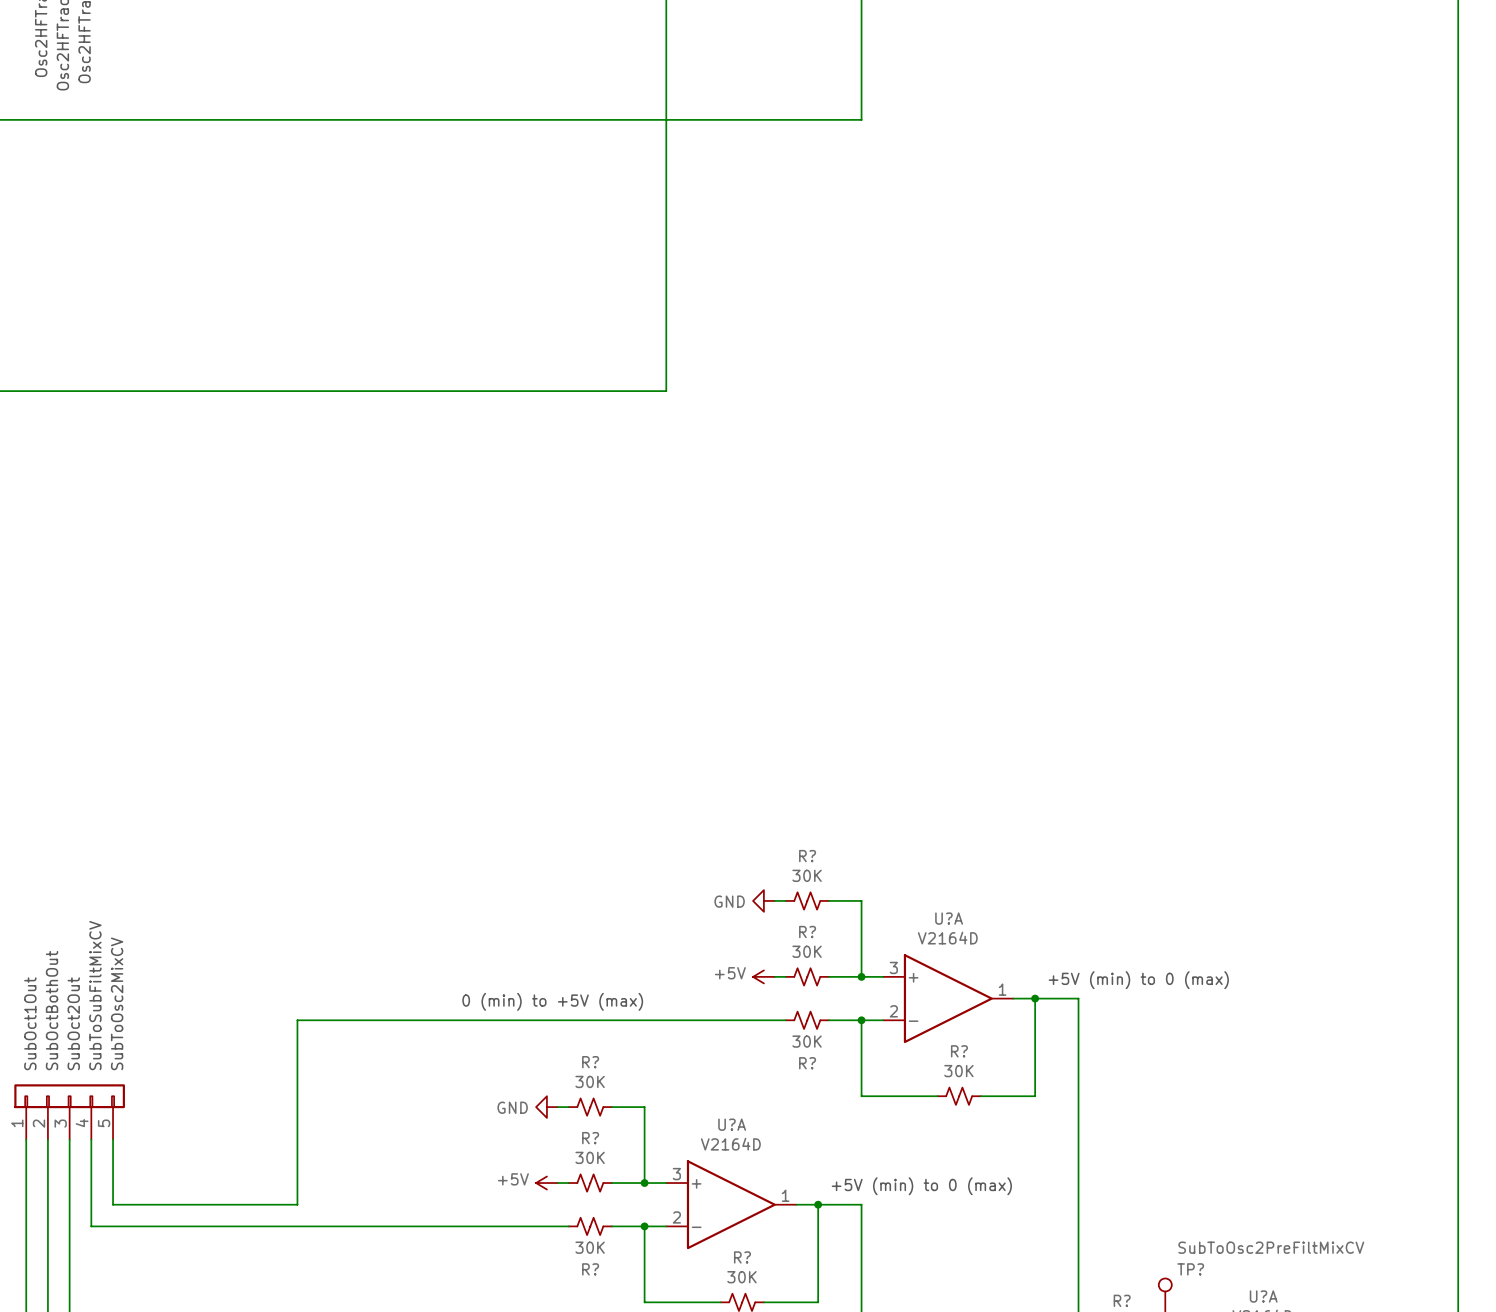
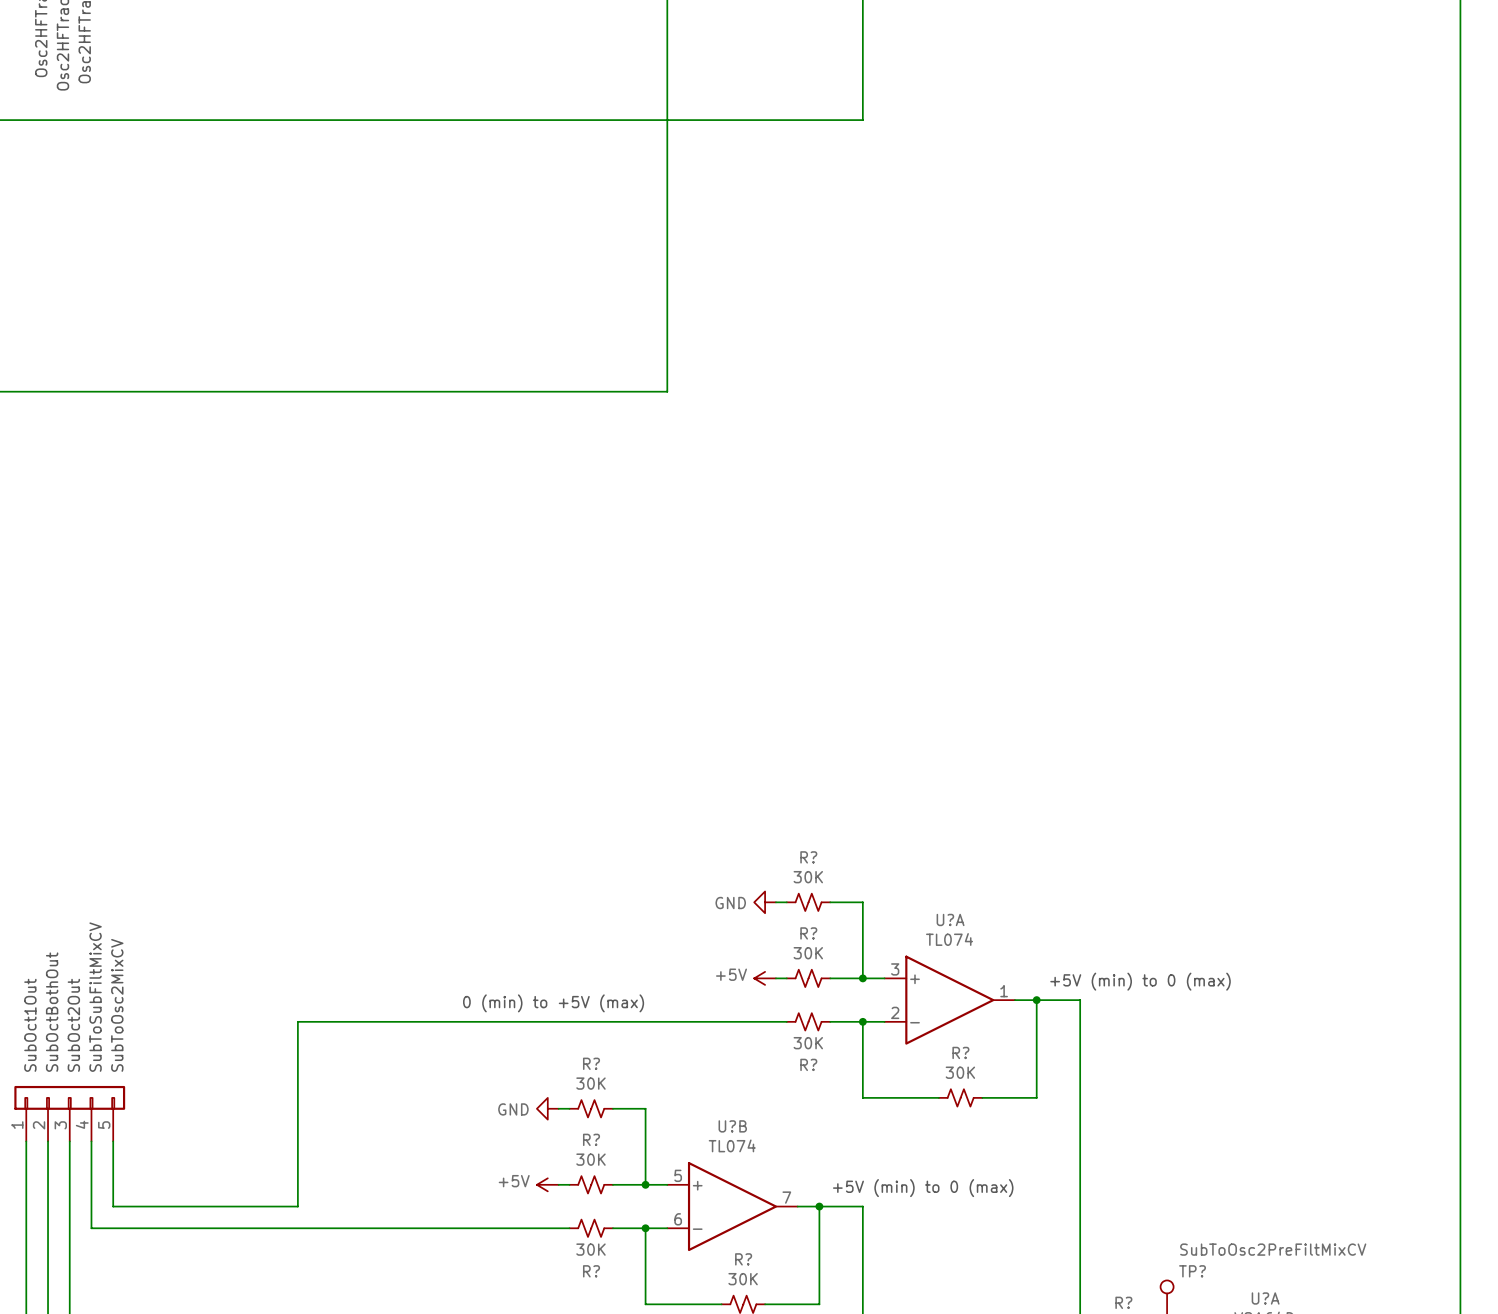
U?A value: V2164D (947, 938) -> TL074 (949, 939)
U?A name: U?A (732, 1124) -> U?B (732, 1126)
U?A value: V2164D (730, 1144) -> TL074 (732, 1145)
U?A pin number: 3 (676, 1174) -> 5 (678, 1175)
U?A pin number: 1 (785, 1195) -> 7 (786, 1197)
U?A pin number: 2 (676, 1217) -> 6 (678, 1219)

